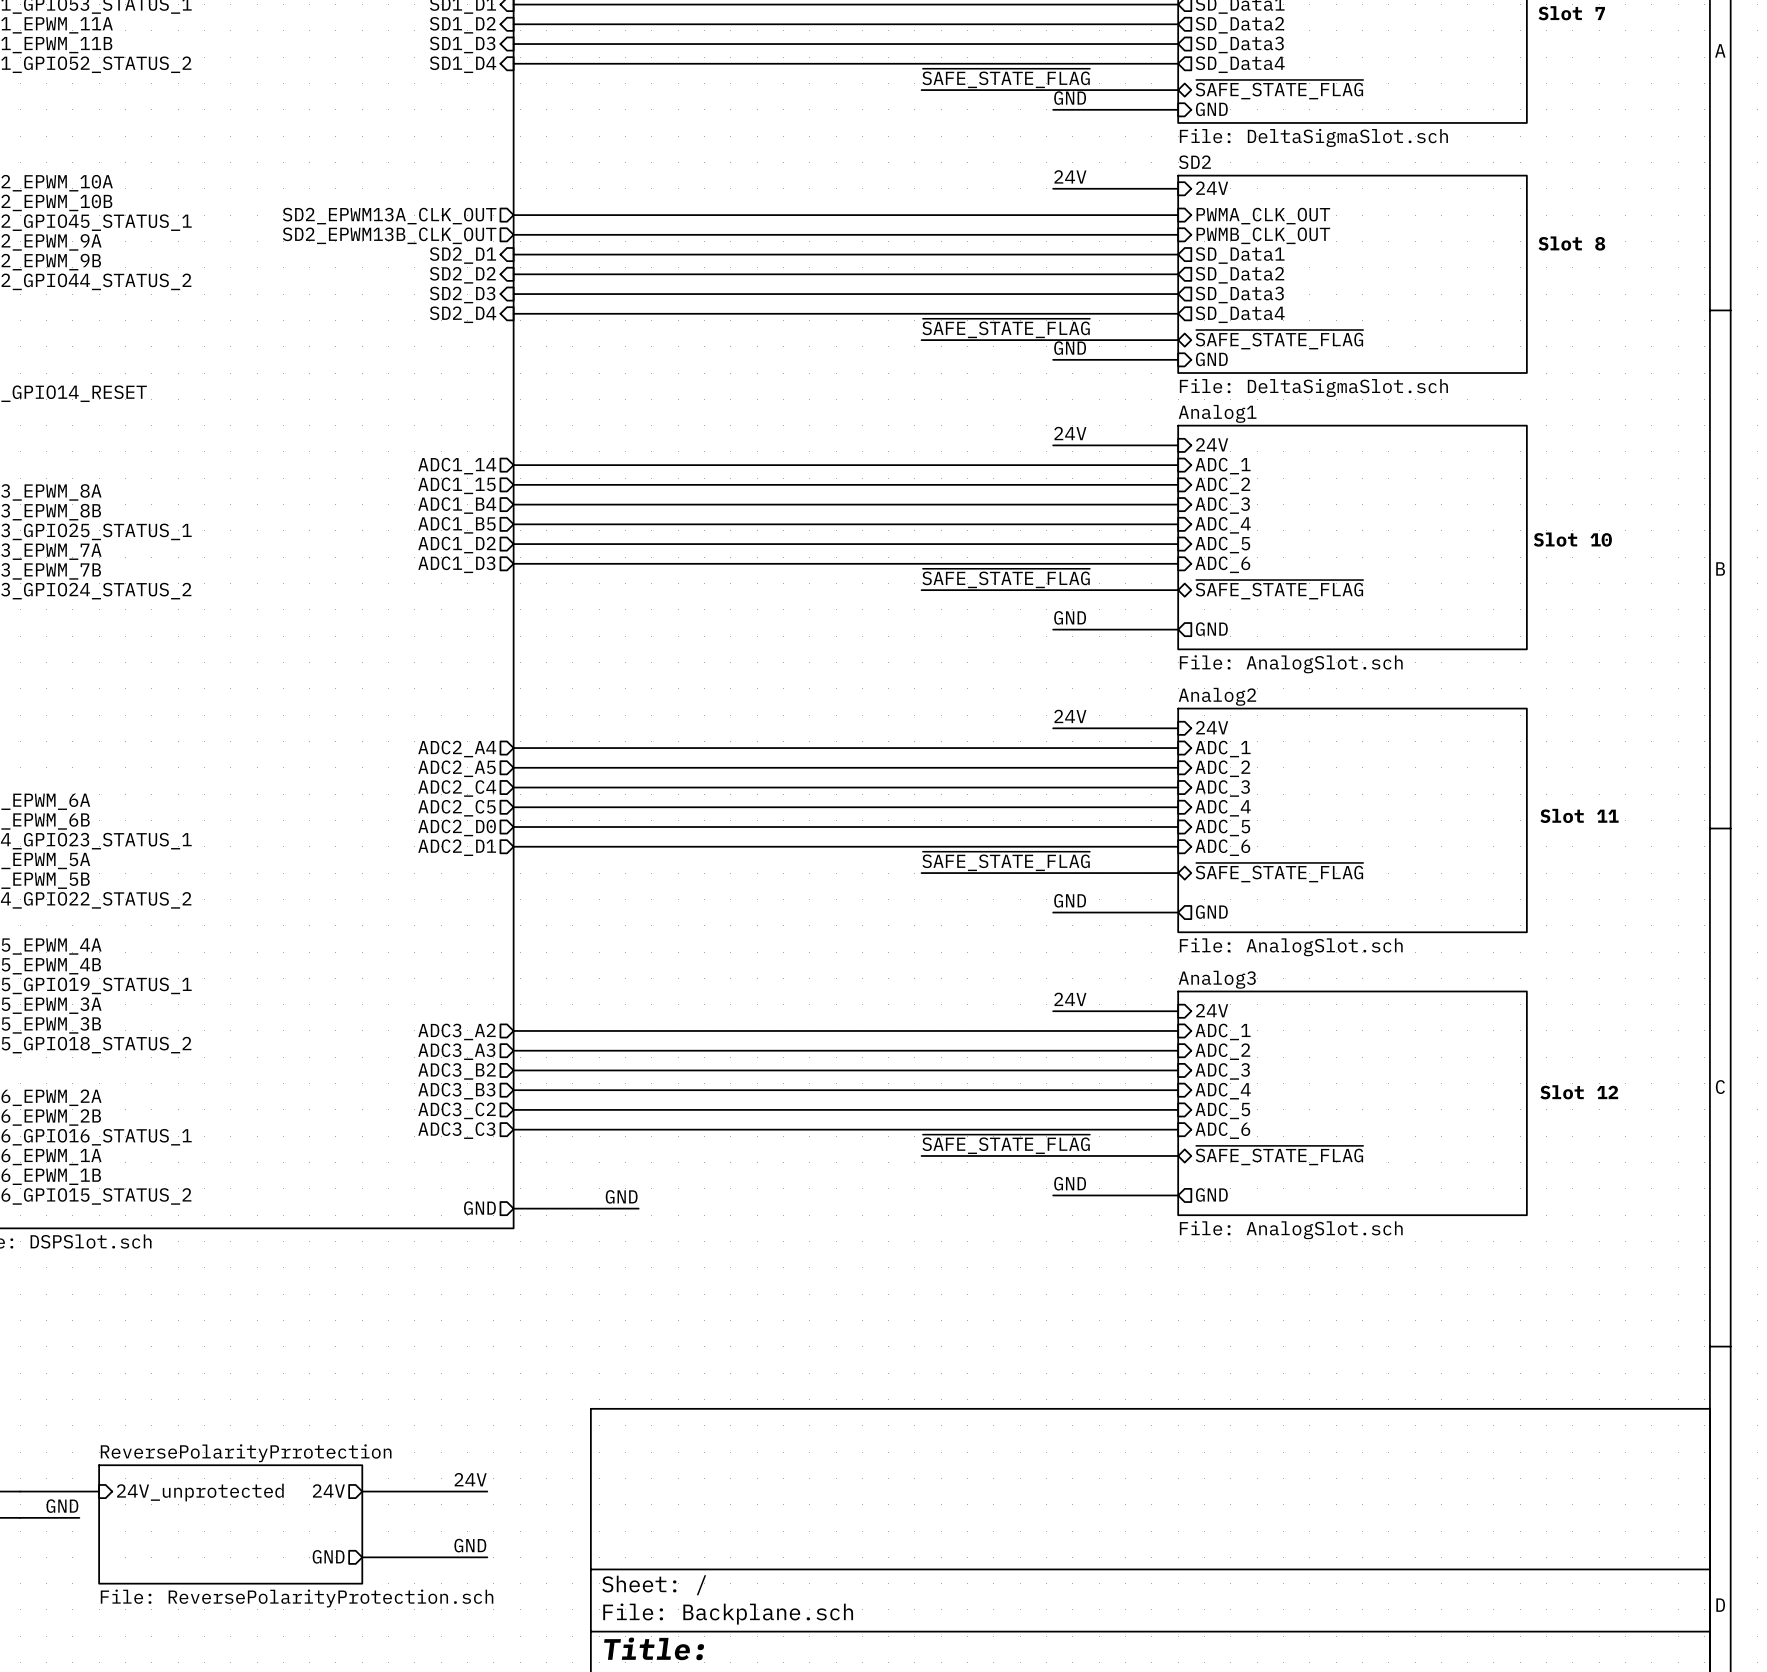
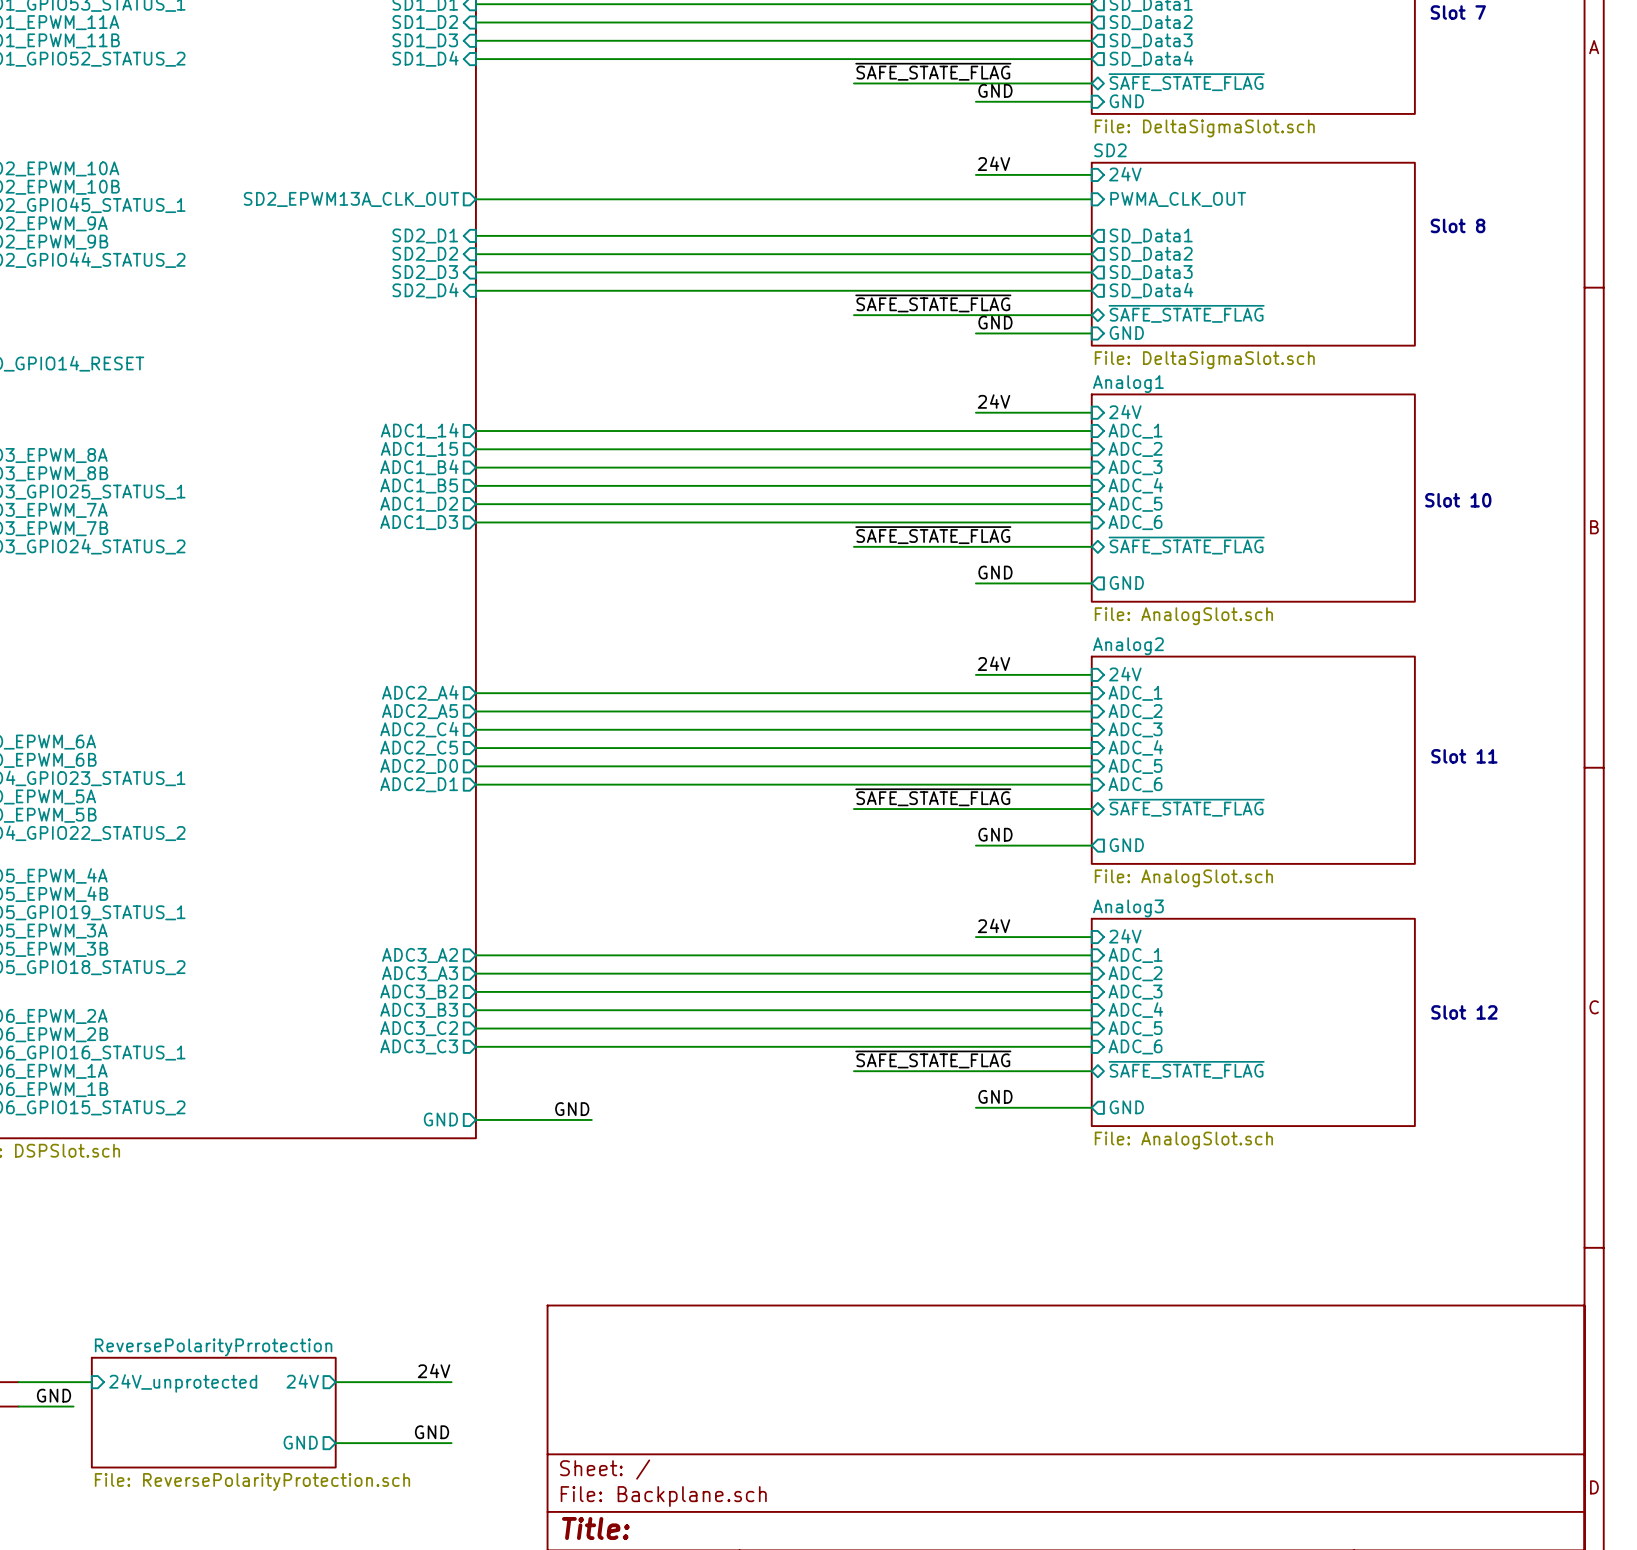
wire: (513, 234) (1178, 234) -> none
sheet pin: SD2_EPWM13B_CLK_OUT (389, 235) -> none
sheet pin: PWMB_CLK_OUT (1263, 235) -> none

